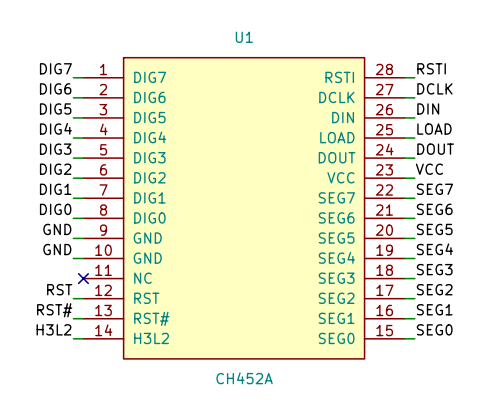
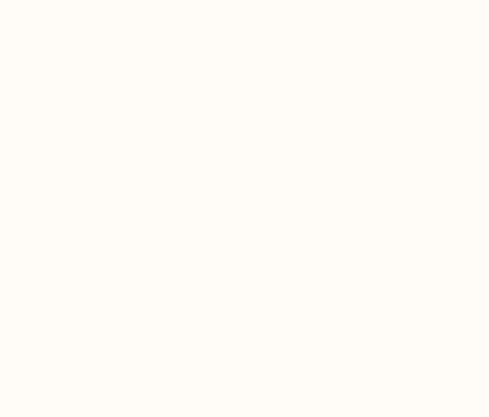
label: DIG7 (55, 68) -> none
label: RSTI (431, 68) -> none
wire: (73, 77) (83, 77) -> none
wire: (404, 77) (414, 77) -> none
label: DIG6 (55, 88) -> none
label: DCLK (434, 88) -> none
wire: (73, 97) (83, 97) -> none
wire: (404, 97) (414, 97) -> none
label: DIG5 (55, 108) -> none
label: DIN (428, 108) -> none
wire: (73, 117) (83, 117) -> none
wire: (404, 117) (414, 117) -> none
label: DIG4 (55, 128) -> none
label: LOAD (434, 129) -> none
wire: (73, 138) (83, 138) -> none
wire: (404, 138) (414, 138) -> none
label: DIG3 (55, 149) -> none
label: DOUT (435, 149) -> none
wire: (73, 158) (83, 158) -> none
wire: (404, 158) (414, 158) -> none
label: DIG2 (55, 169) -> none
label: VCC (429, 169) -> none
wire: (73, 178) (83, 178) -> none
wire: (404, 178) (414, 178) -> none
label: DIG1 (55, 189) -> none
label: SEG7 (434, 189) -> none
wire: (73, 198) (83, 198) -> none
wire: (404, 198) (414, 198) -> none
U1: CH452A (244, 208) -> none
label: DIG0 (55, 209) -> none
label: SEG6 (434, 209) -> none
wire: (73, 218) (83, 218) -> none
wire: (404, 218) (414, 218) -> none
label: GND (57, 229) -> none
label: SEG5 (434, 229) -> none
wire: (73, 238) (83, 238) -> none
wire: (404, 238) (414, 238) -> none
label: GND (57, 249) -> none
label: SEG4 (434, 249) -> none
wire: (73, 258) (83, 258) -> none
wire: (404, 258) (414, 258) -> none
label: SEG3 (434, 269) -> none
no-connect mark: (83, 278) -> none
wire: (404, 278) (414, 278) -> none
label: RST (59, 289) -> none
label: SEG2 (434, 289) -> none
wire: (73, 298) (83, 298) -> none
wire: (404, 298) (414, 298) -> none
label: SEG1 (434, 309) -> none
label: RST# (54, 310) -> none
wire: (73, 318) (83, 318) -> none
wire: (404, 318) (414, 318) -> none
label: H3L2 (53, 329) -> none
label: SEG0 (434, 329) -> none
wire: (73, 338) (83, 338) -> none
wire: (404, 338) (414, 338) -> none

